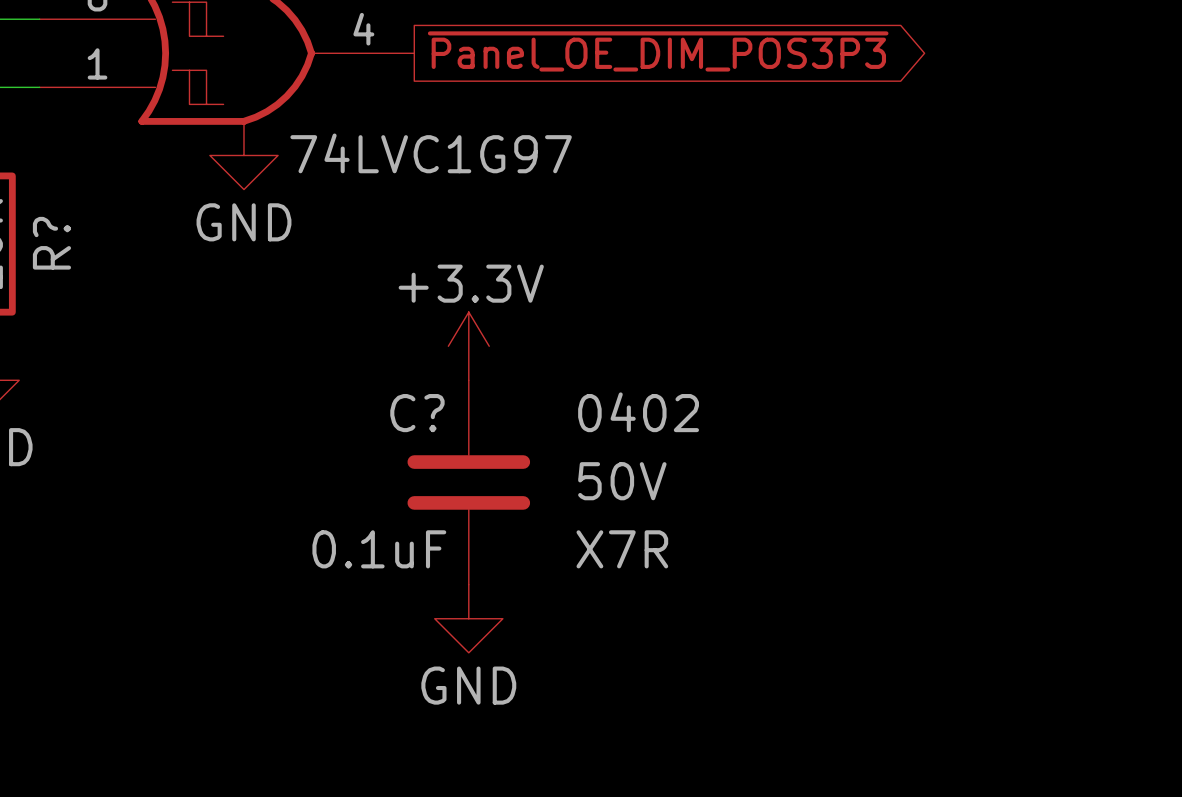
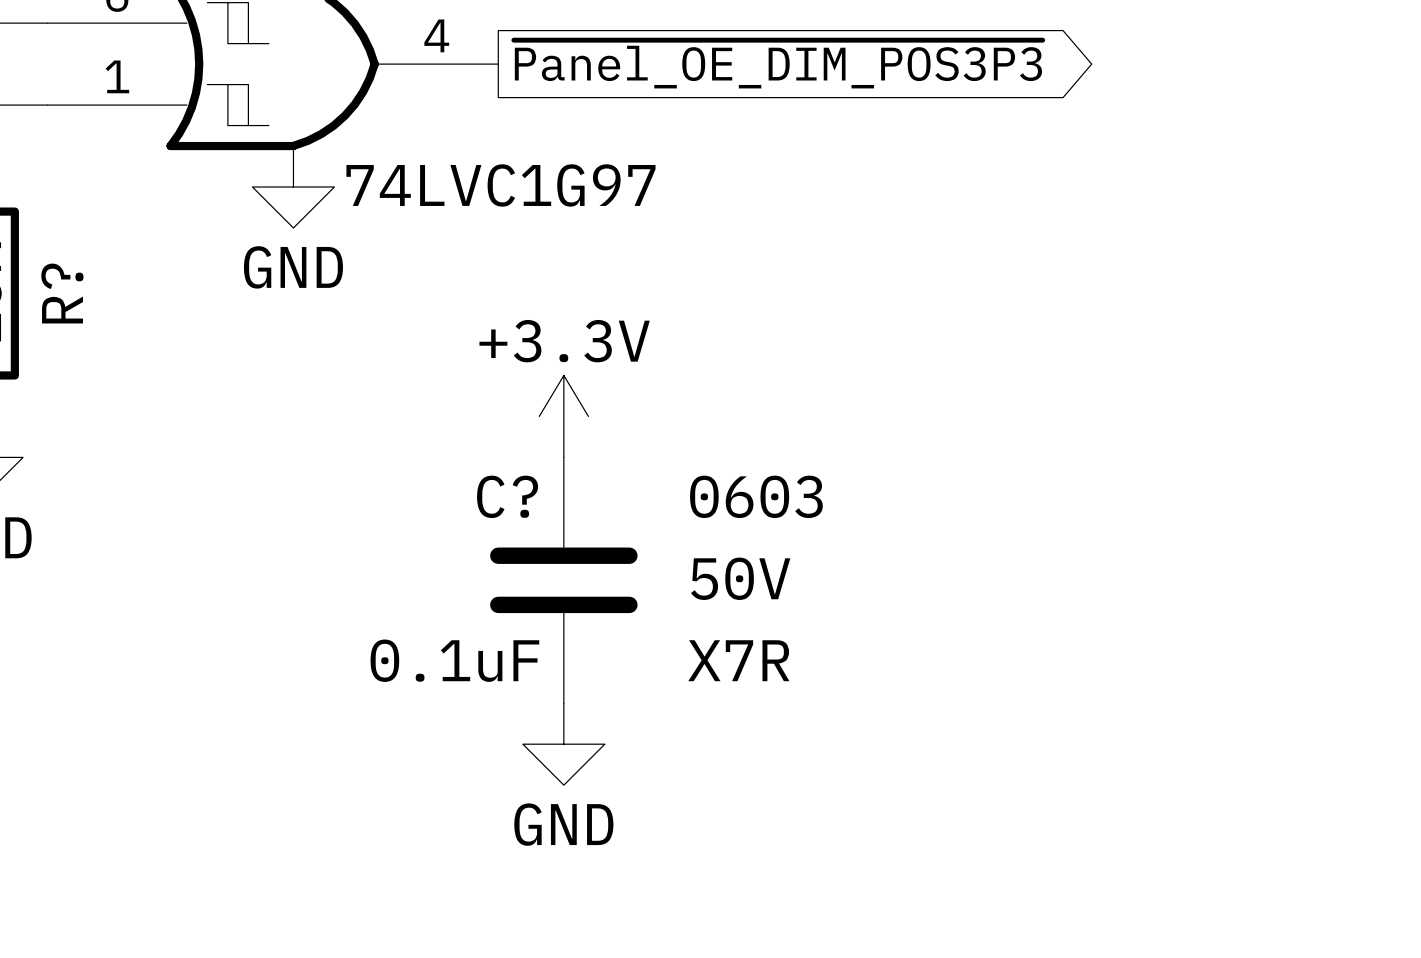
C? text: 0402 (638, 412) -> 0603 (756, 496)

